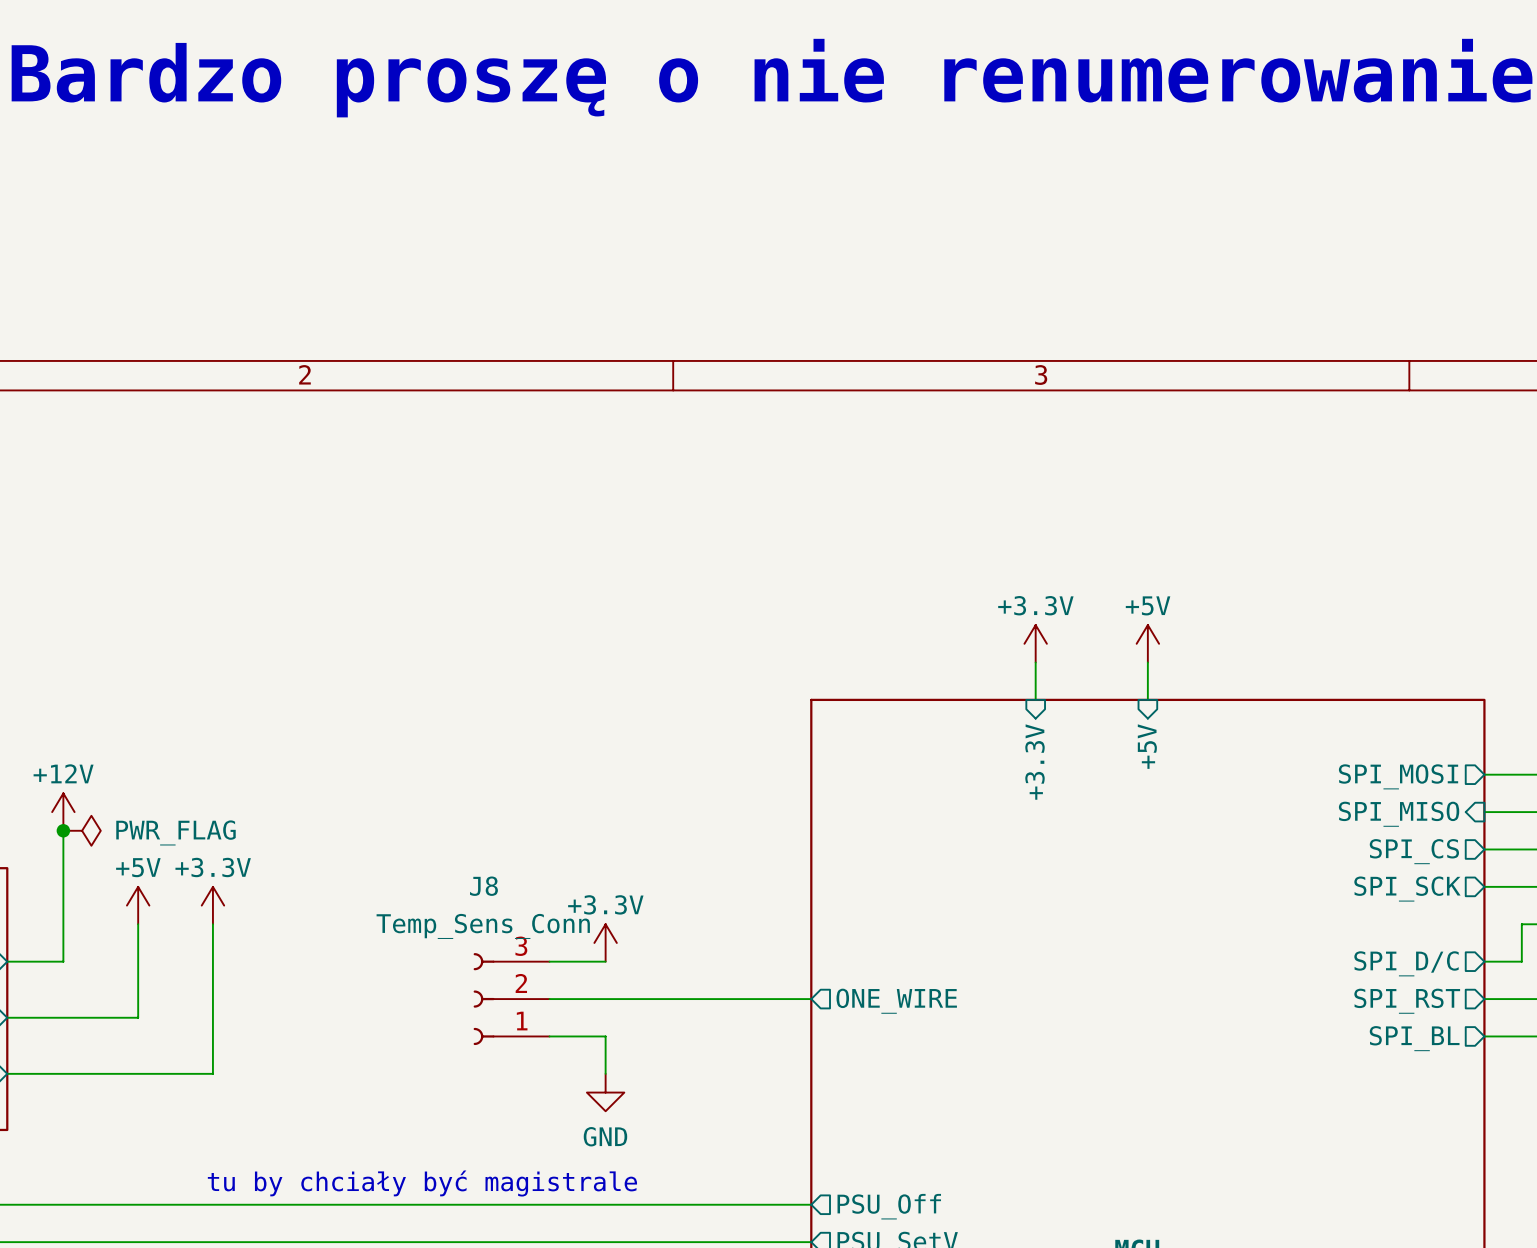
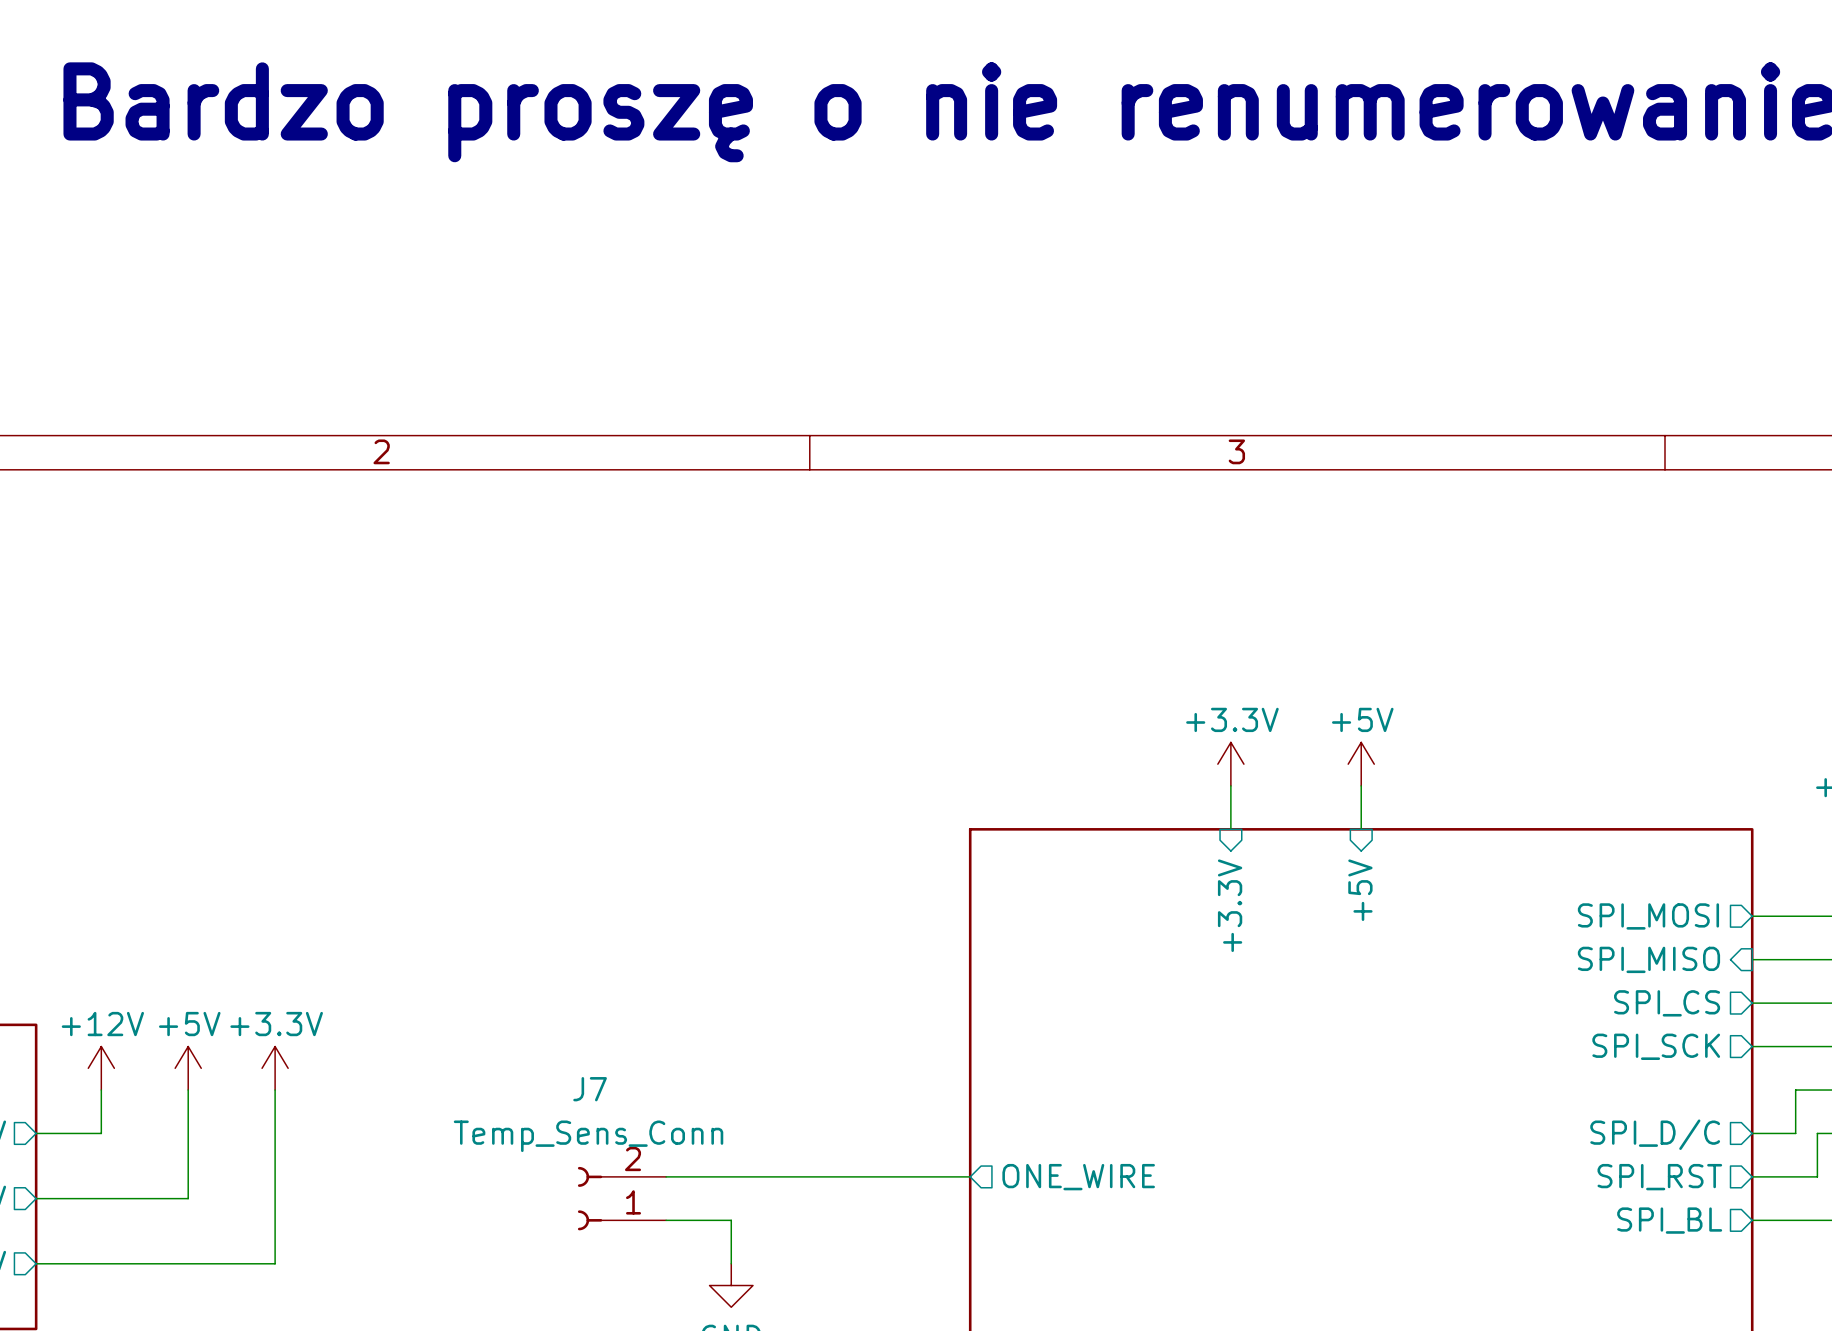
power symbol position: +12V (63, 812) -> +12V (101, 1068)
wire: (63, 830) (63, 924) -> none
junction: (63, 830) -> none
power symbol: PWR_FLAG (82, 830) -> none
power symbol: +3.3V (605, 942) -> none
wire: (549, 961) (605, 961) -> none
J8: Temp_Sens_Conn (511, 999) -> none
J7: none -> Temp_Sens_Conn (622, 1198)

